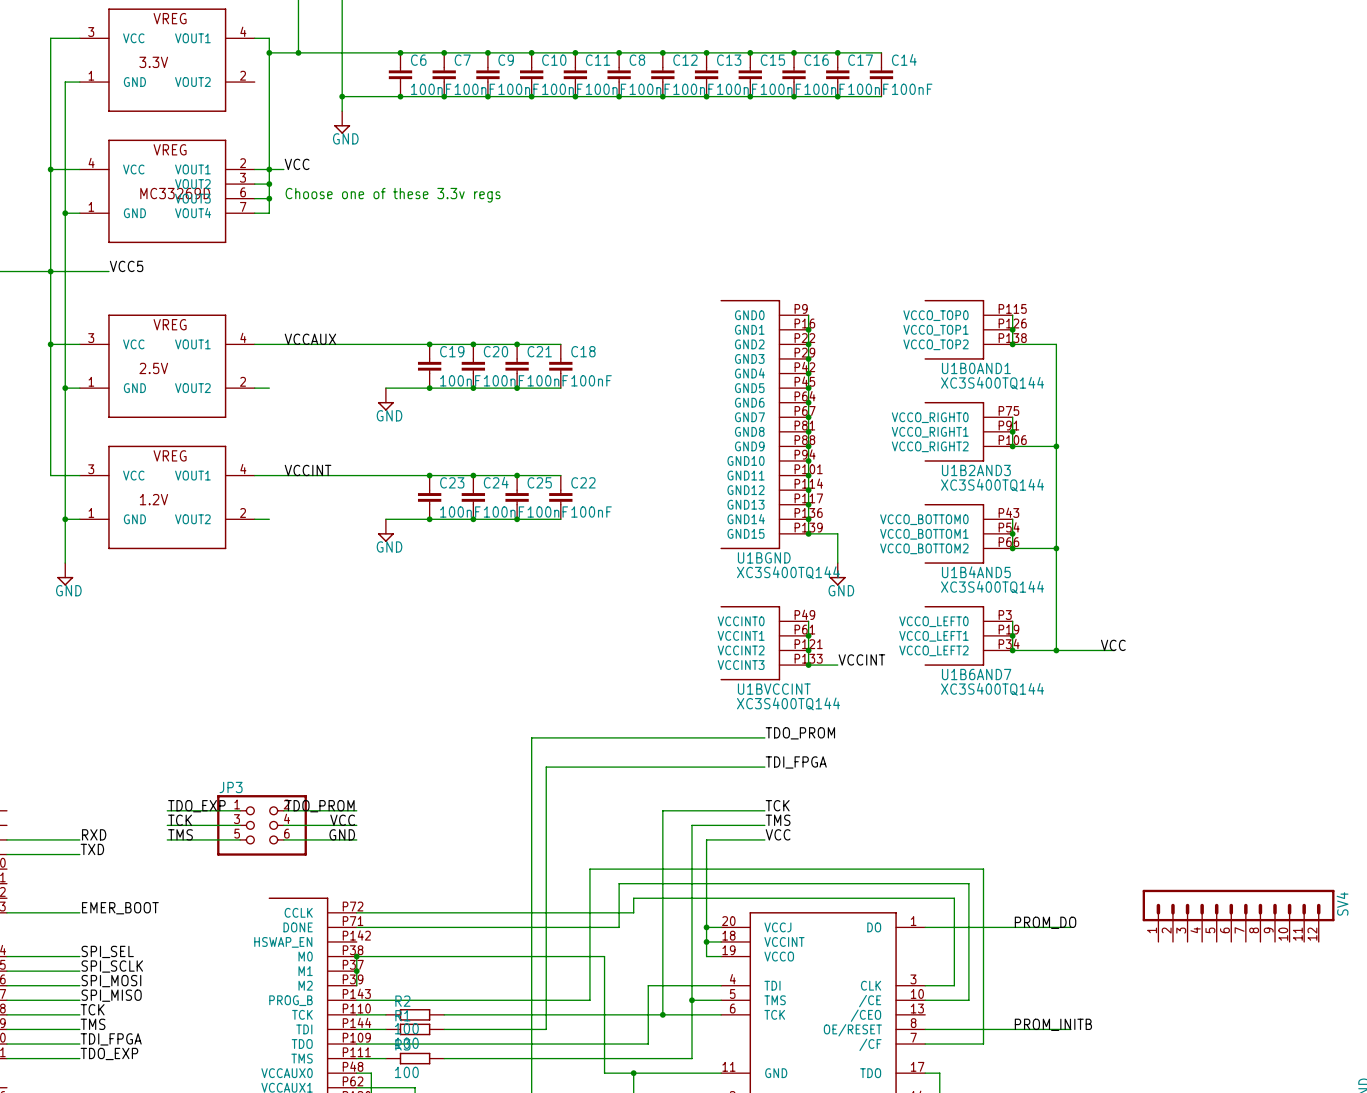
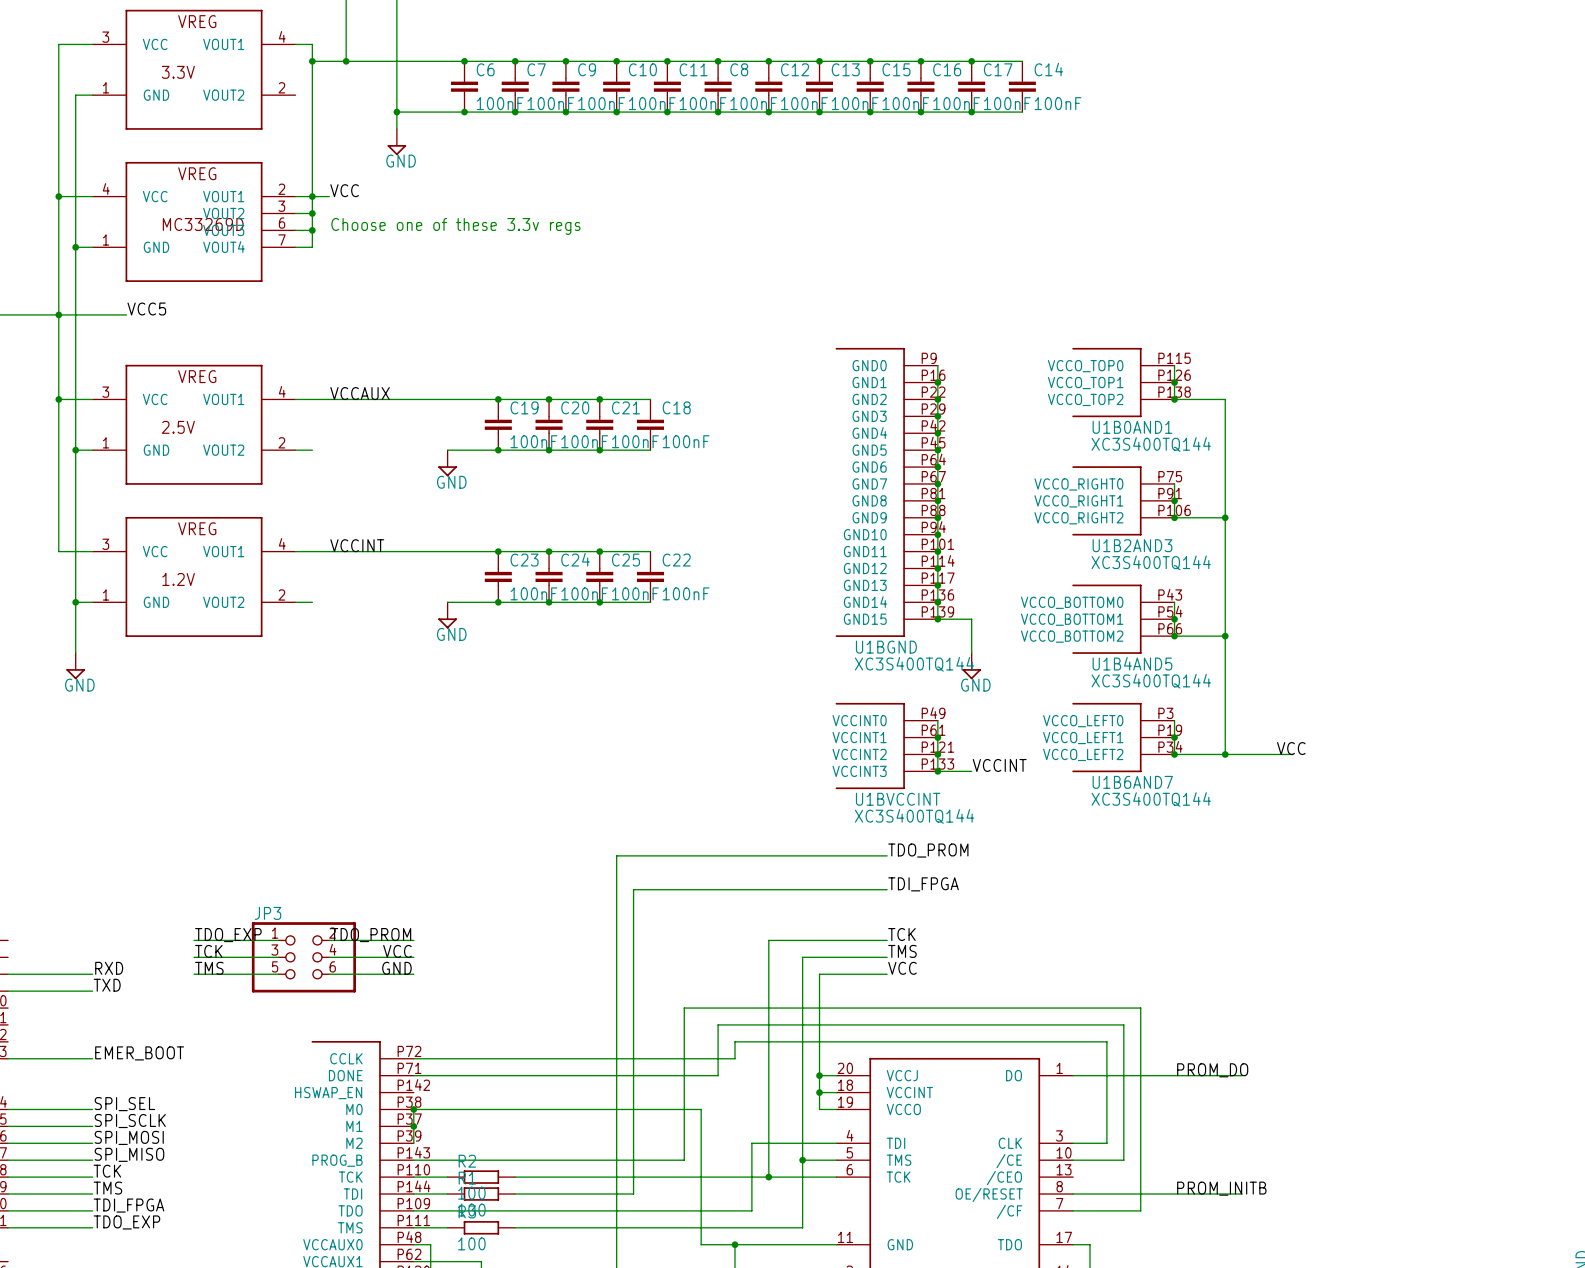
SV4: (1238, 915) -> none

